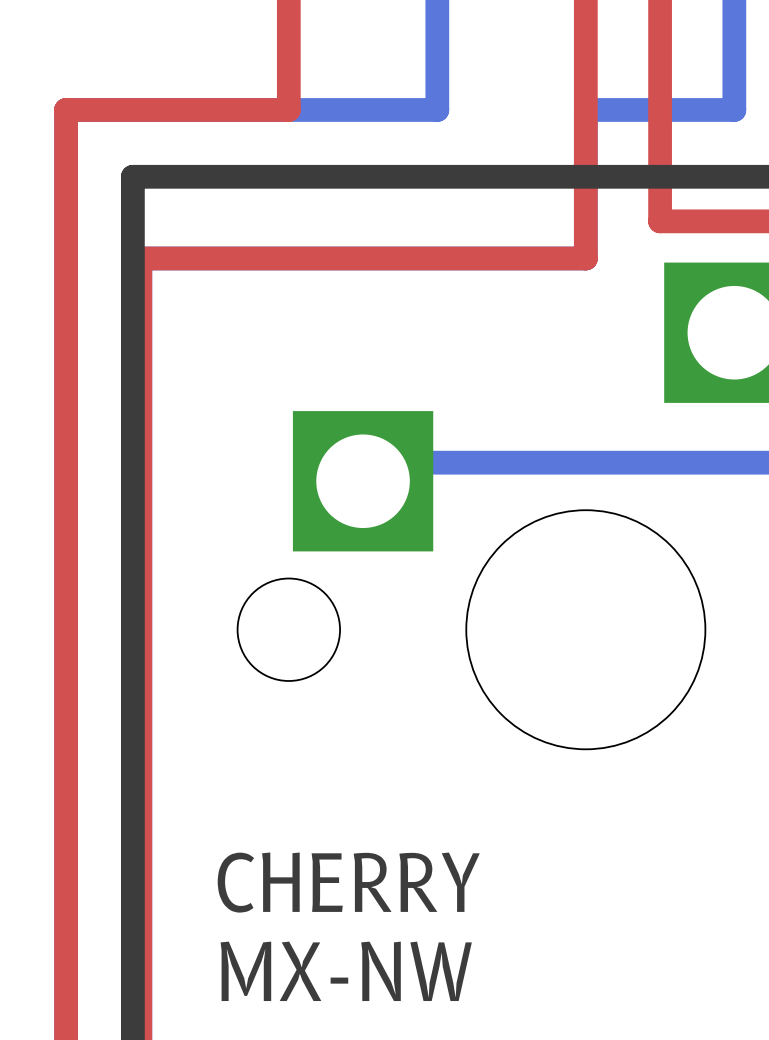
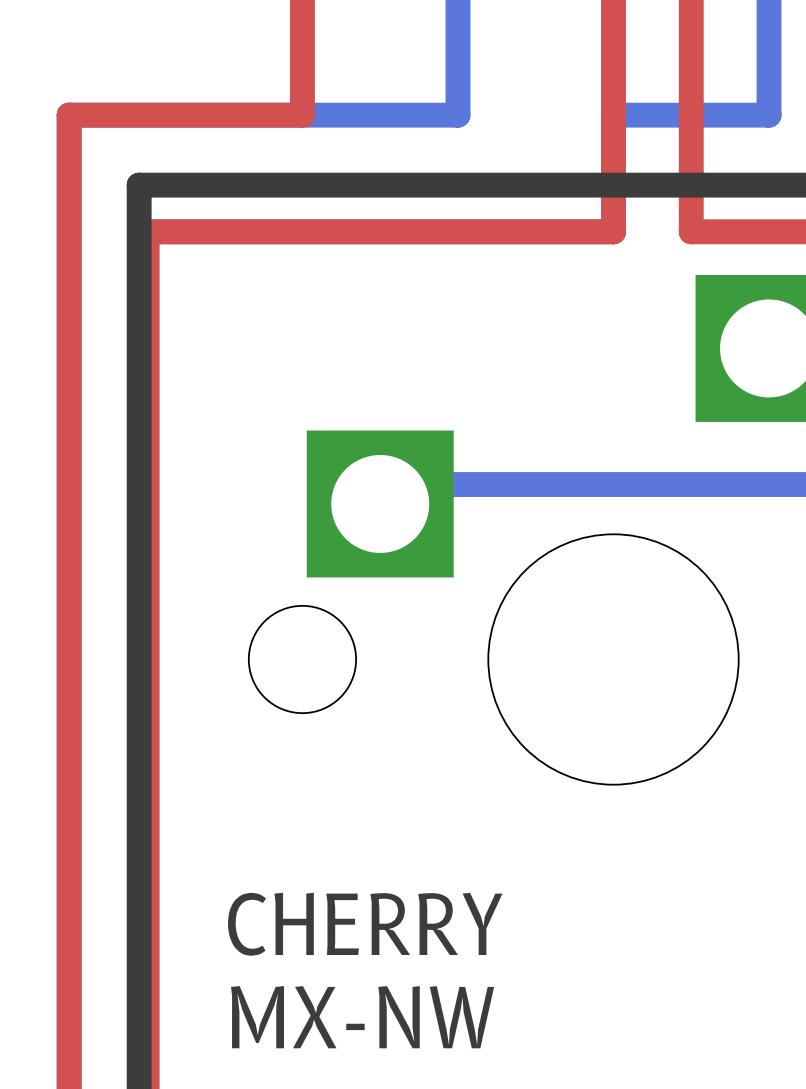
top track: (585, 221) (585, 258) (140, 258) -> (613, 231) (146, 231) (146, 270)

